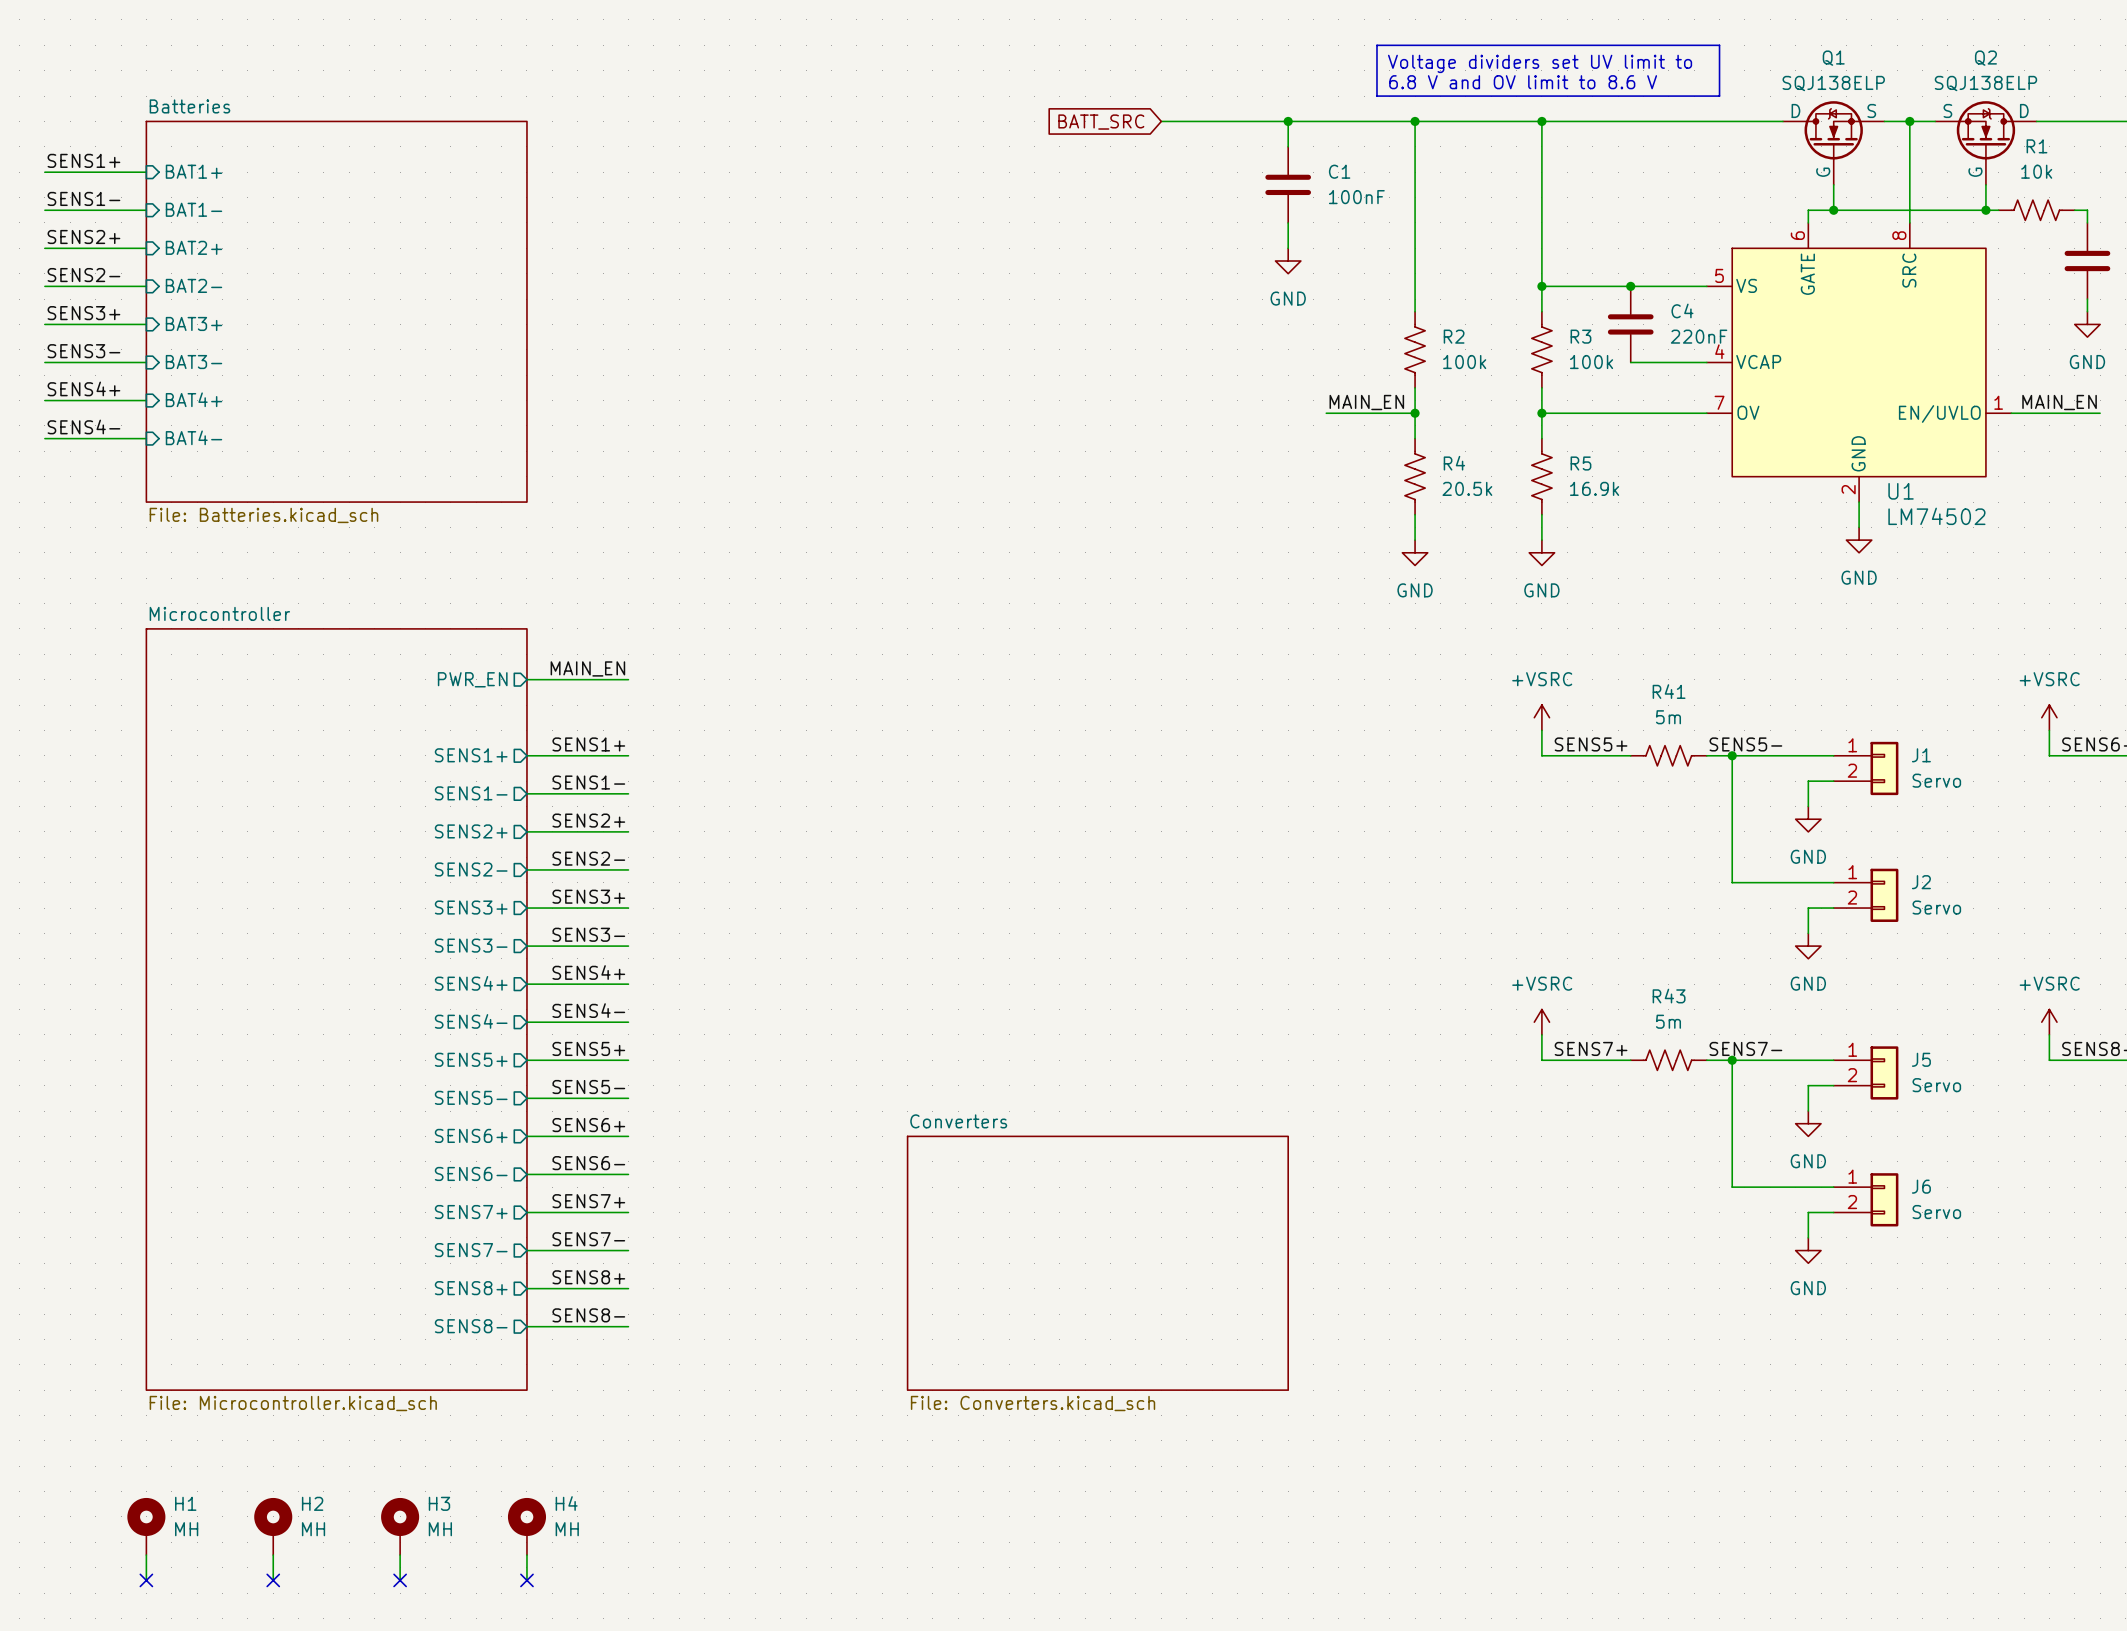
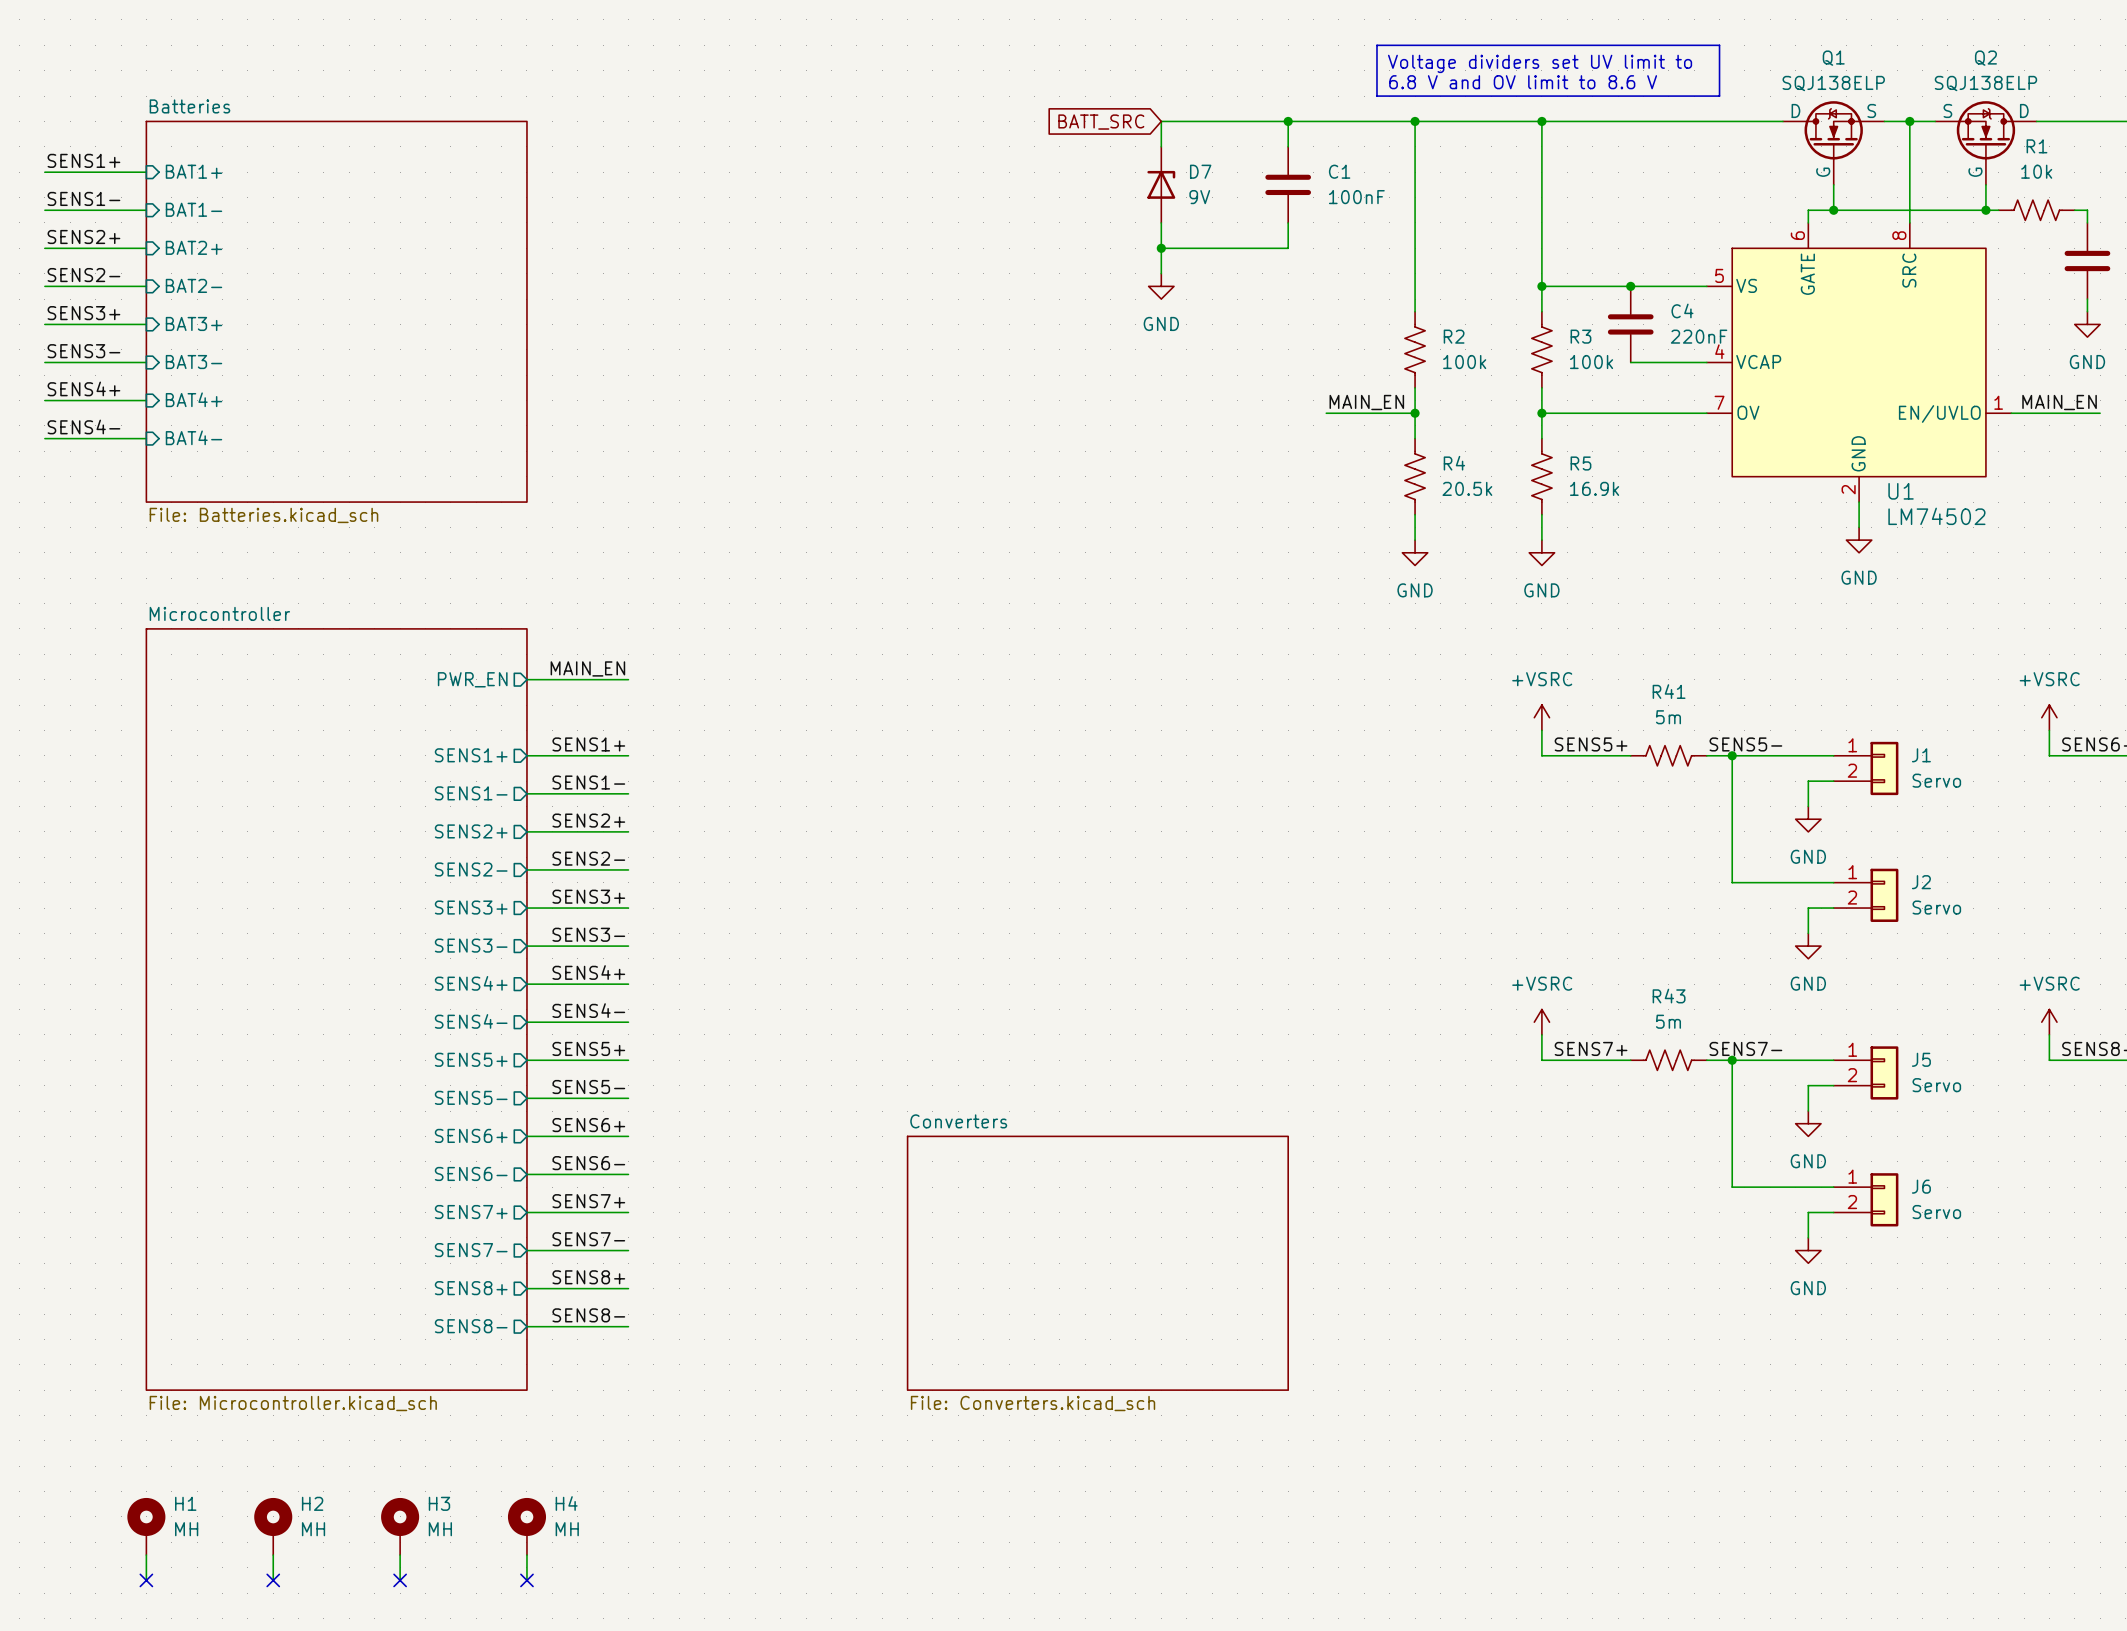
wire: none -> (1161, 121) (1161, 146)
D7: none -> 9V (1161, 184)
wire: none -> (1161, 222) (1161, 273)
wire: none -> (1161, 248) (1288, 248)
junction: none -> (1161, 248)
power symbol position: GND (1288, 261) -> GND (1161, 286)

